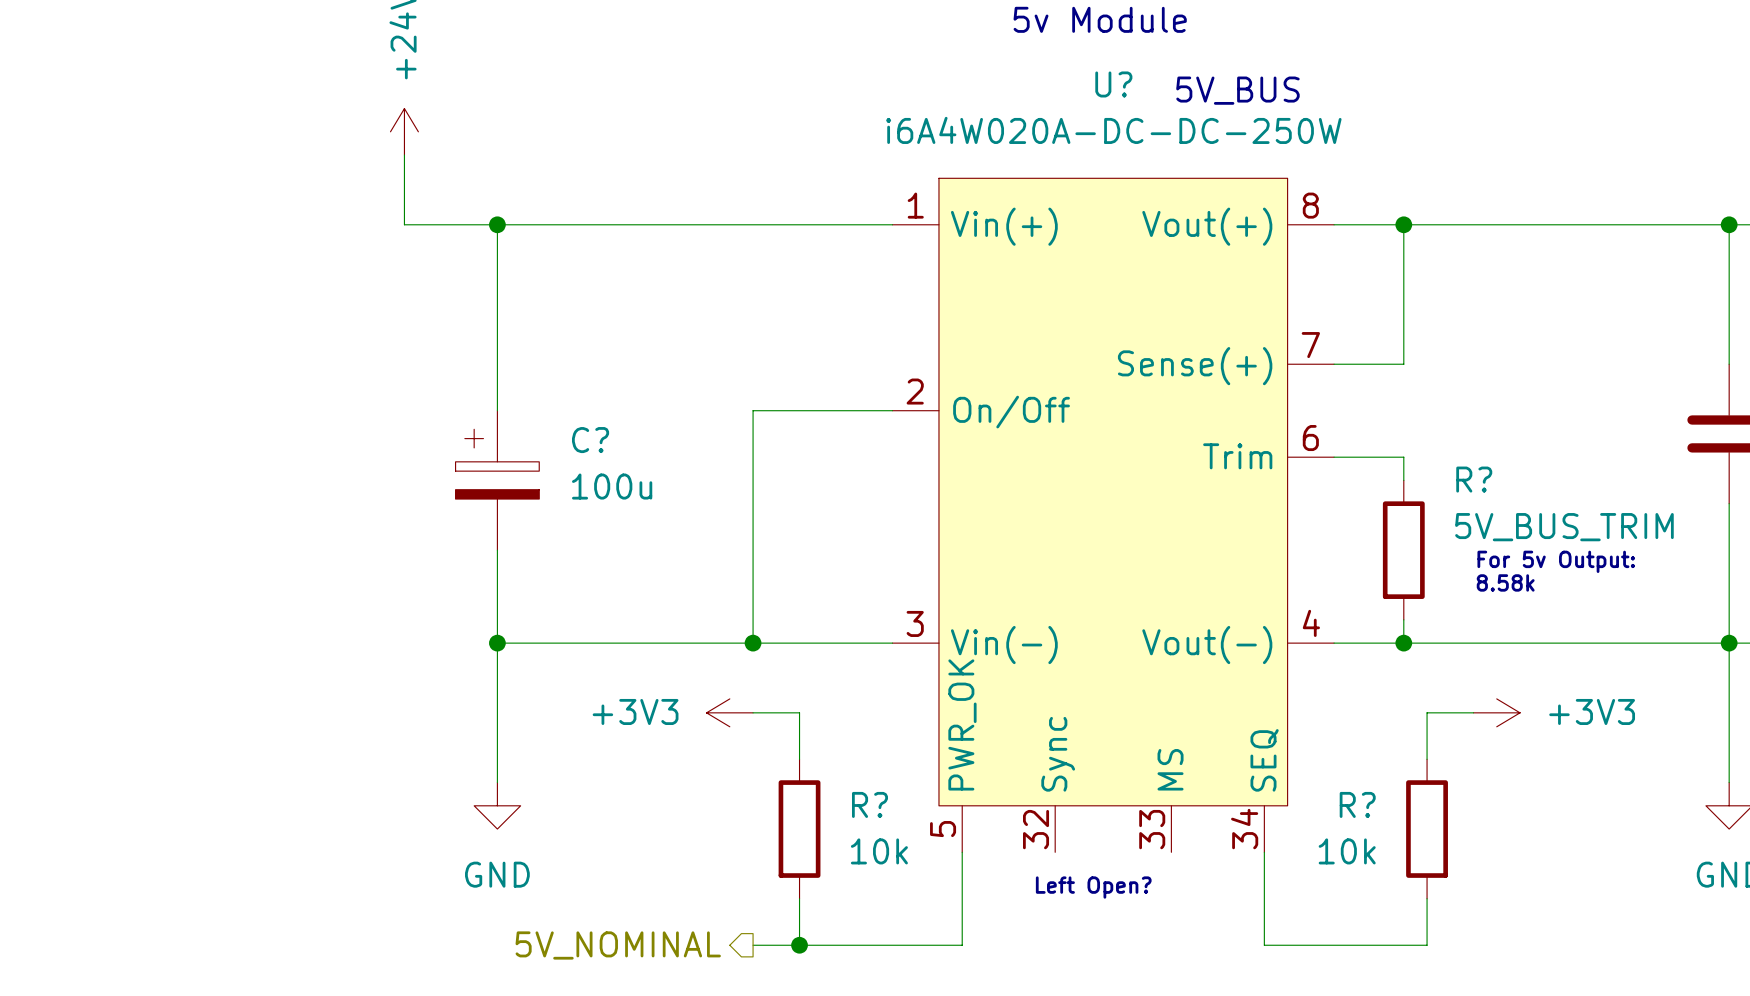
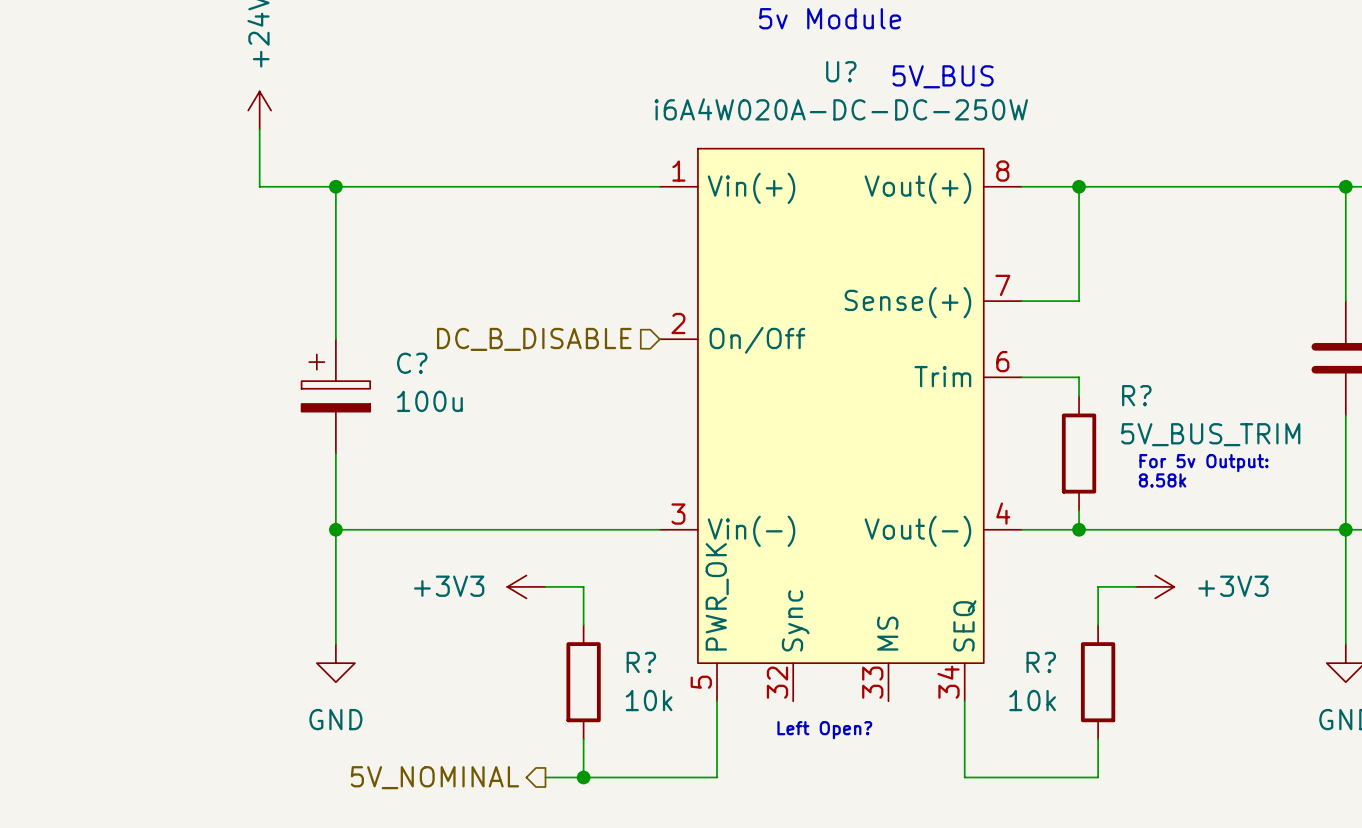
hierarchical label: none -> DC_B_DISABLE (534, 339)
wire: (892, 410) (753, 410) (753, 643) -> none
junction: (753, 643) -> none

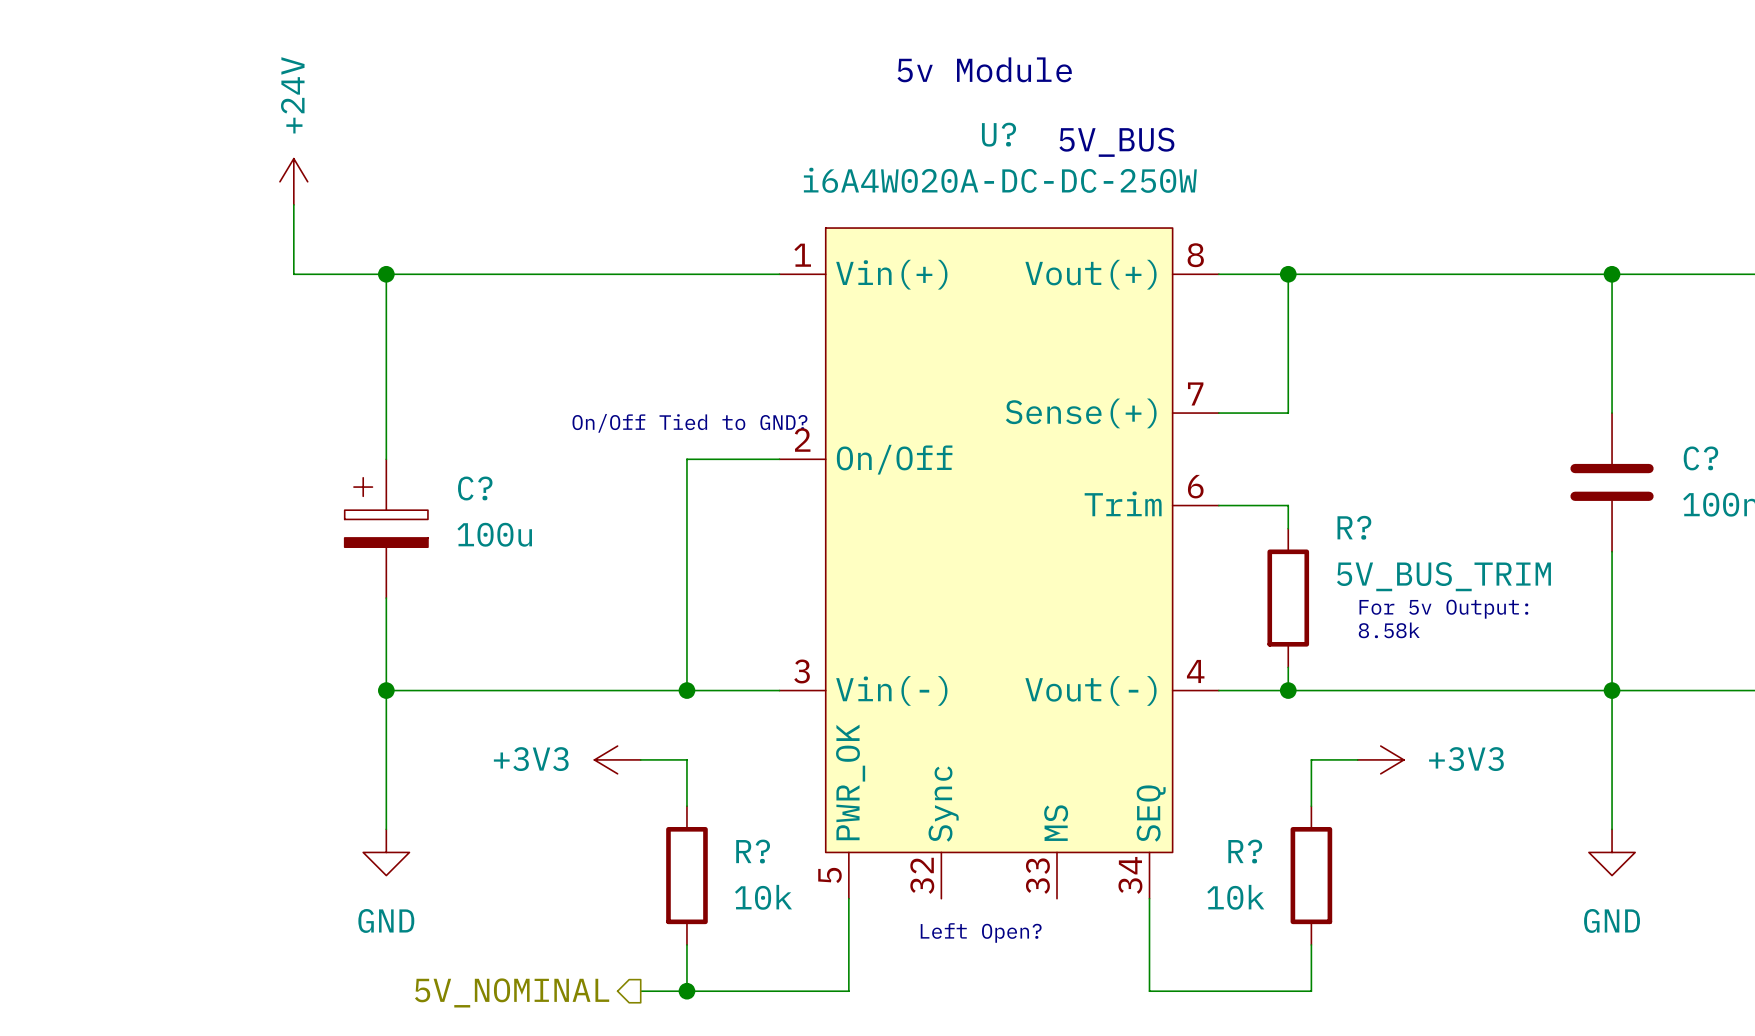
text: none -> On/Off Tied to GND? (689, 423)
hierarchical label: DC_B_DISABLE (534, 339) -> none
wire: none -> (779, 459) (686, 459) (686, 690)
junction: none -> (686, 690)

